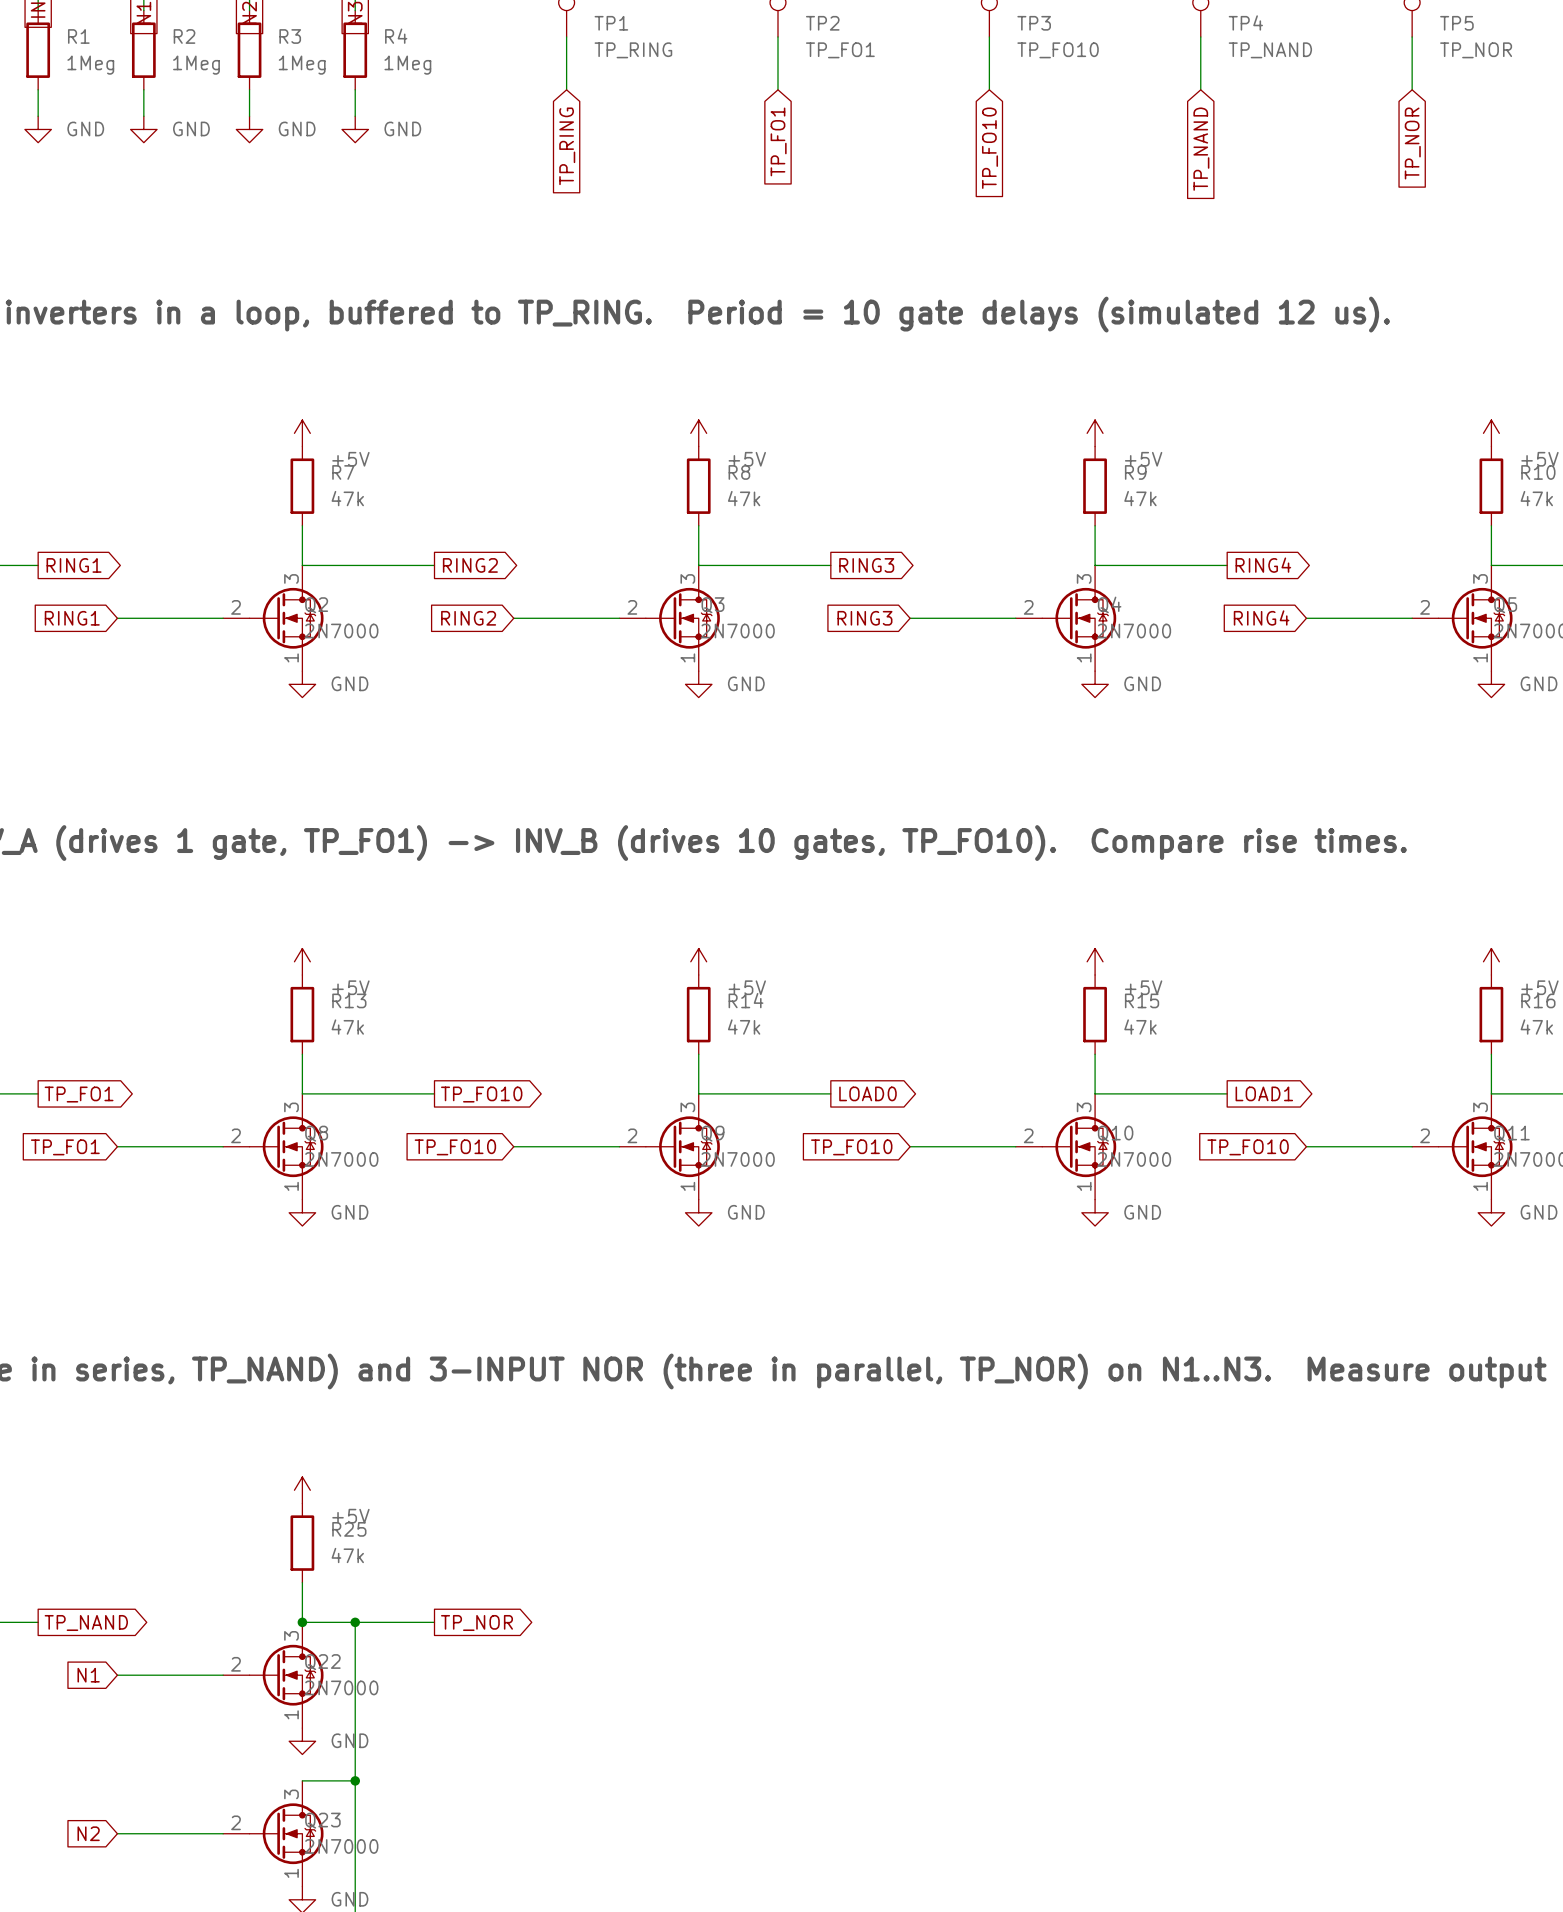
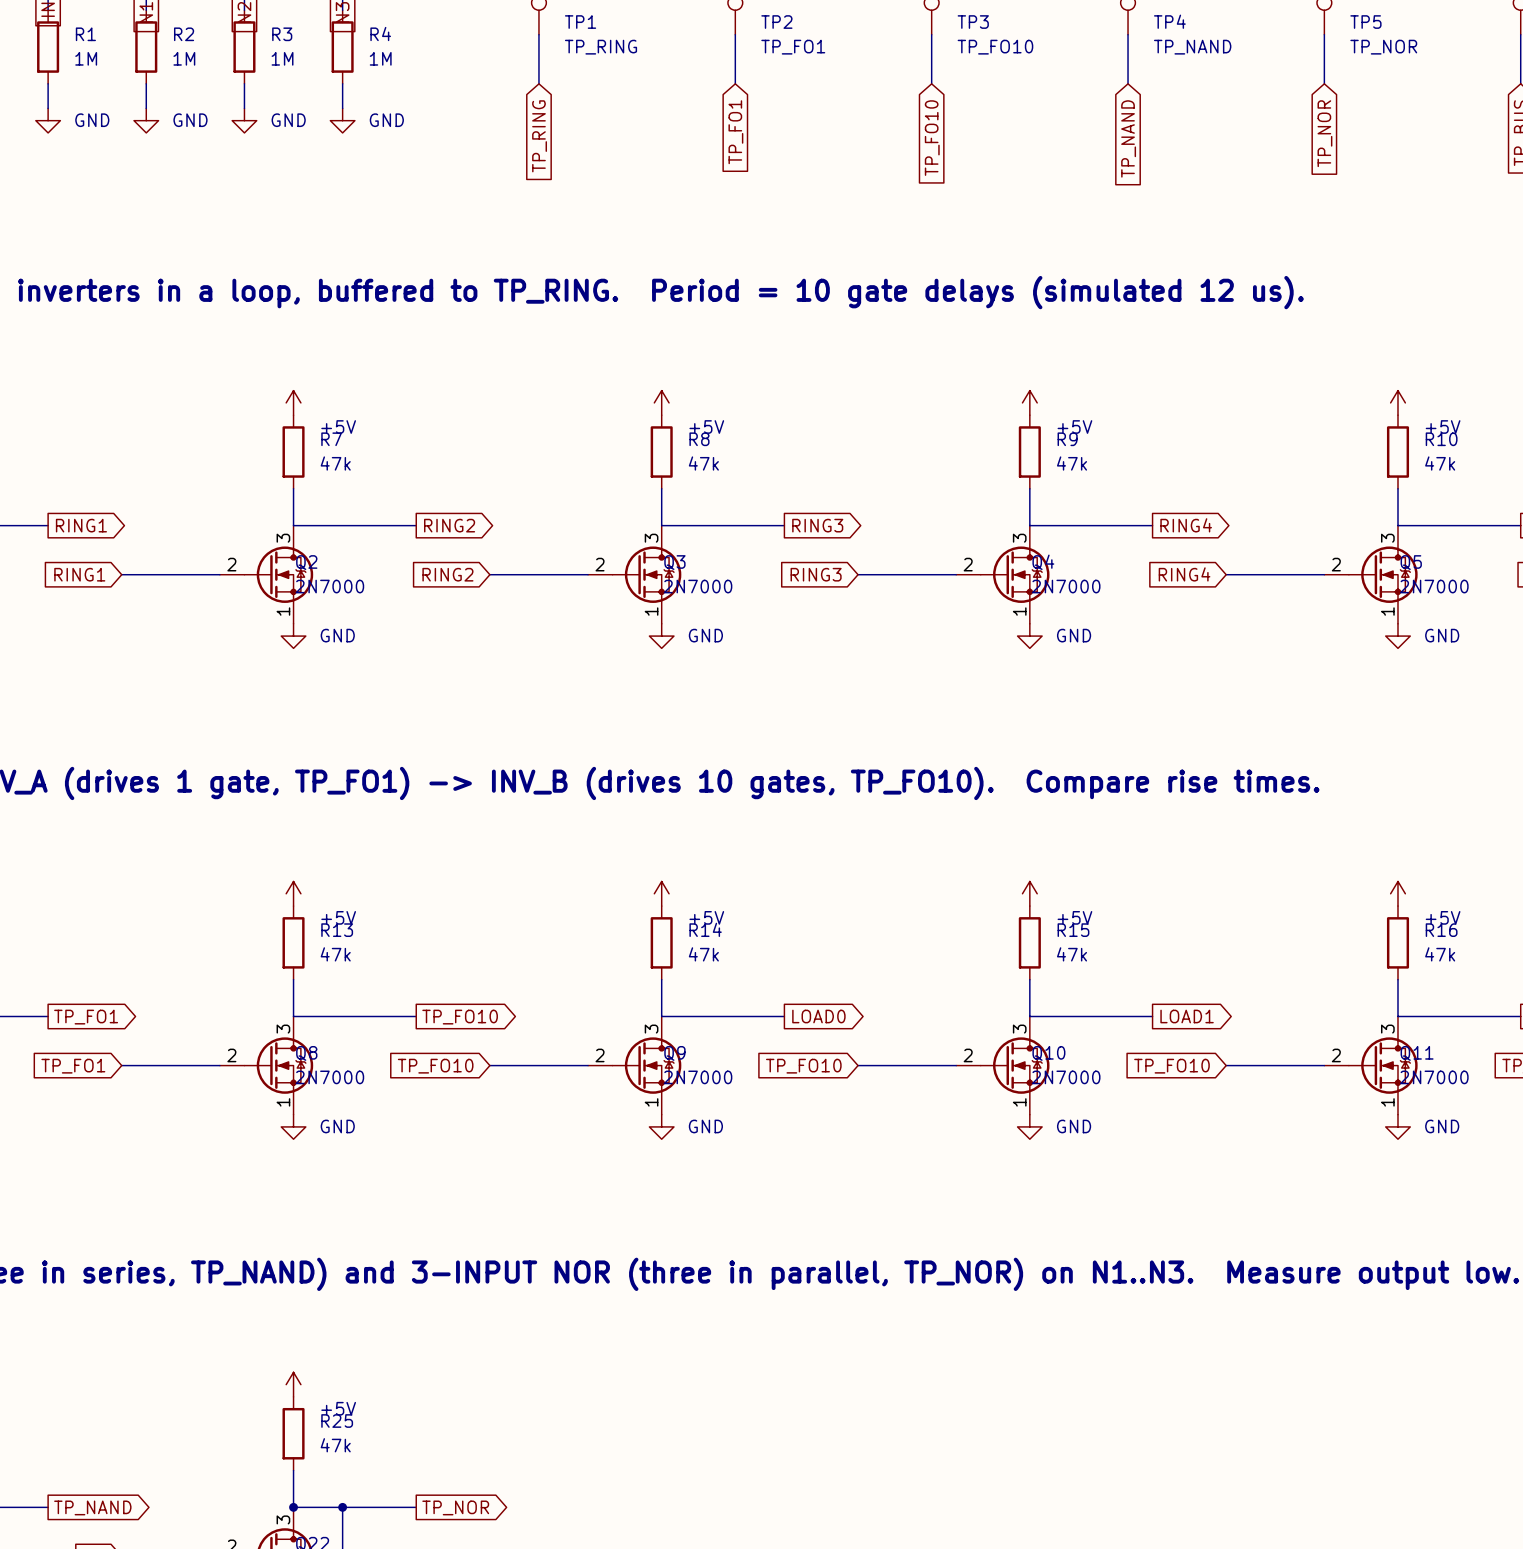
R1 value: 1Meg (90, 65) -> 1M (86, 58)
R2 value: 1Meg (196, 65) -> 1M (184, 58)
R3 value: 1Meg (302, 65) -> 1M (282, 58)
R4 value: 1Meg (407, 65) -> 1M (380, 58)

